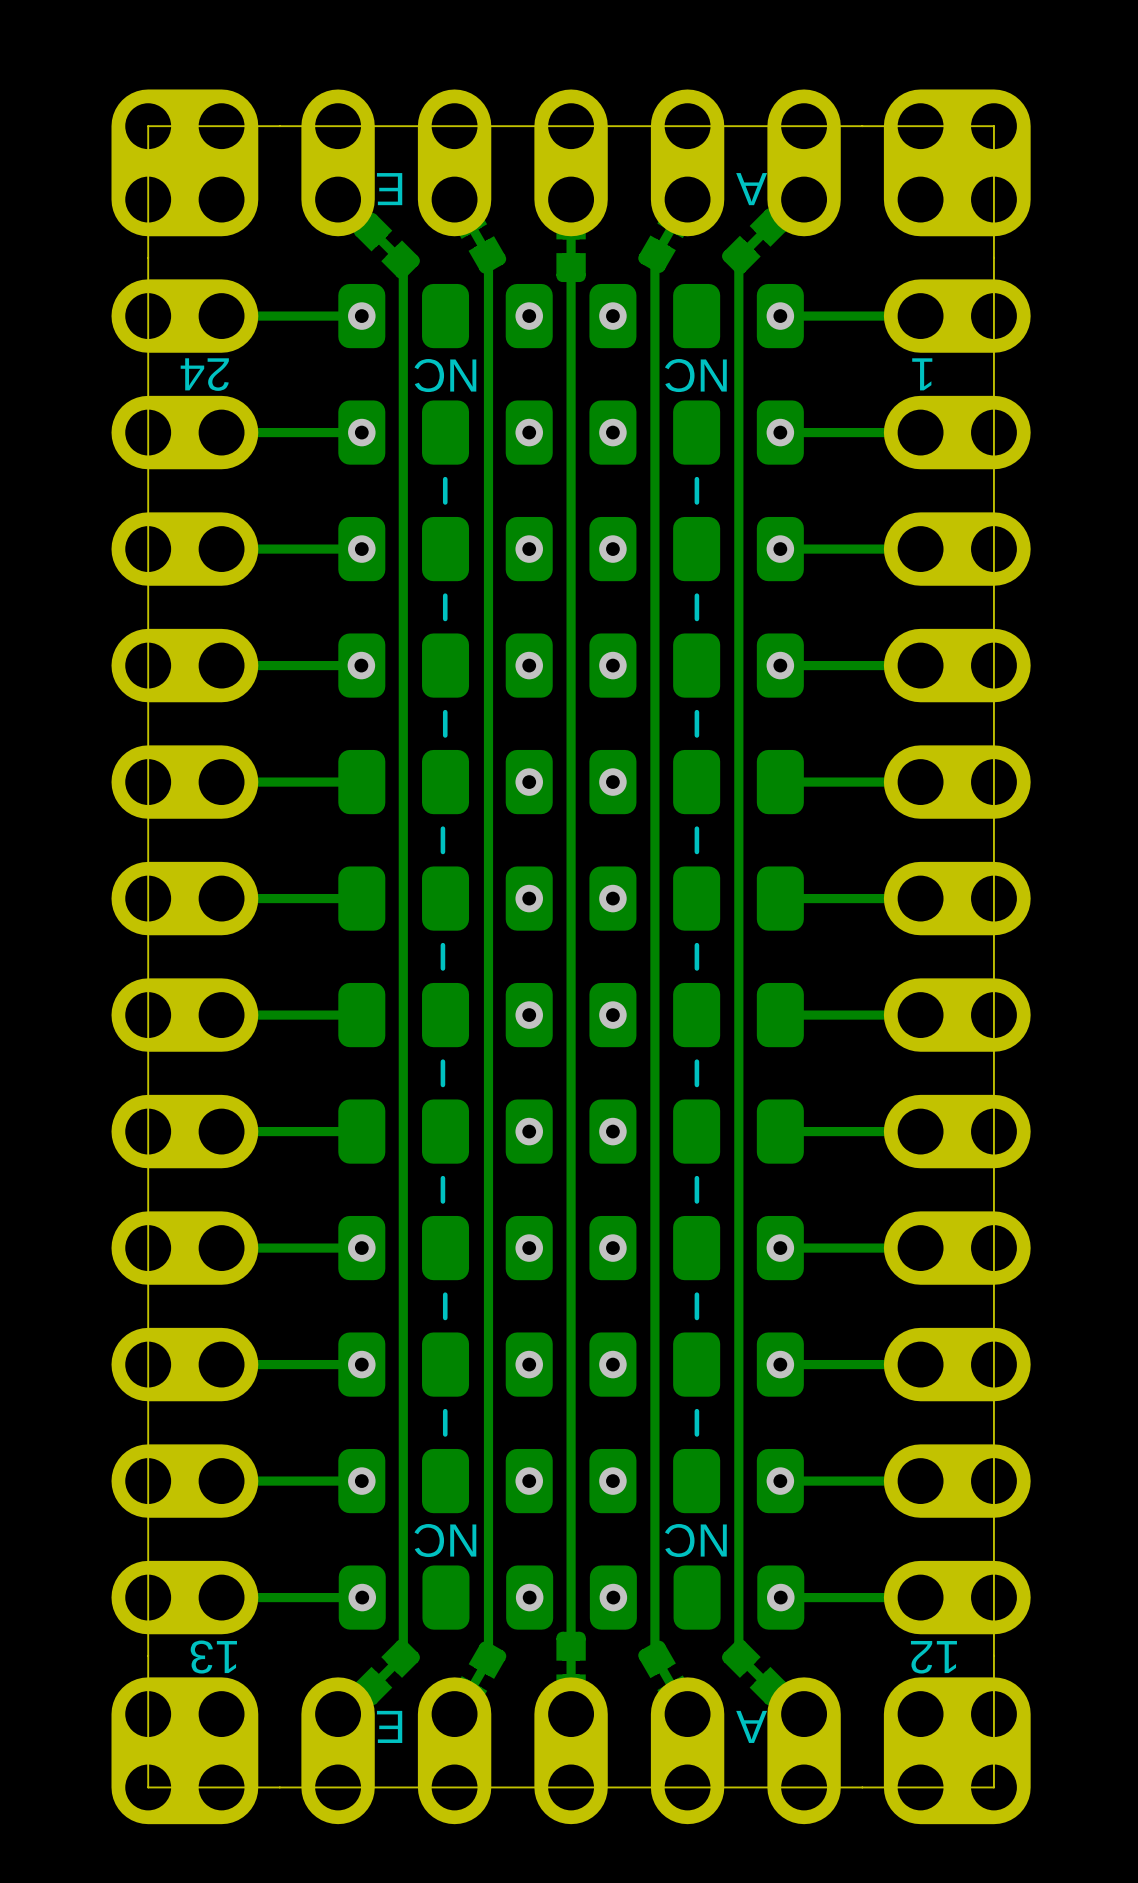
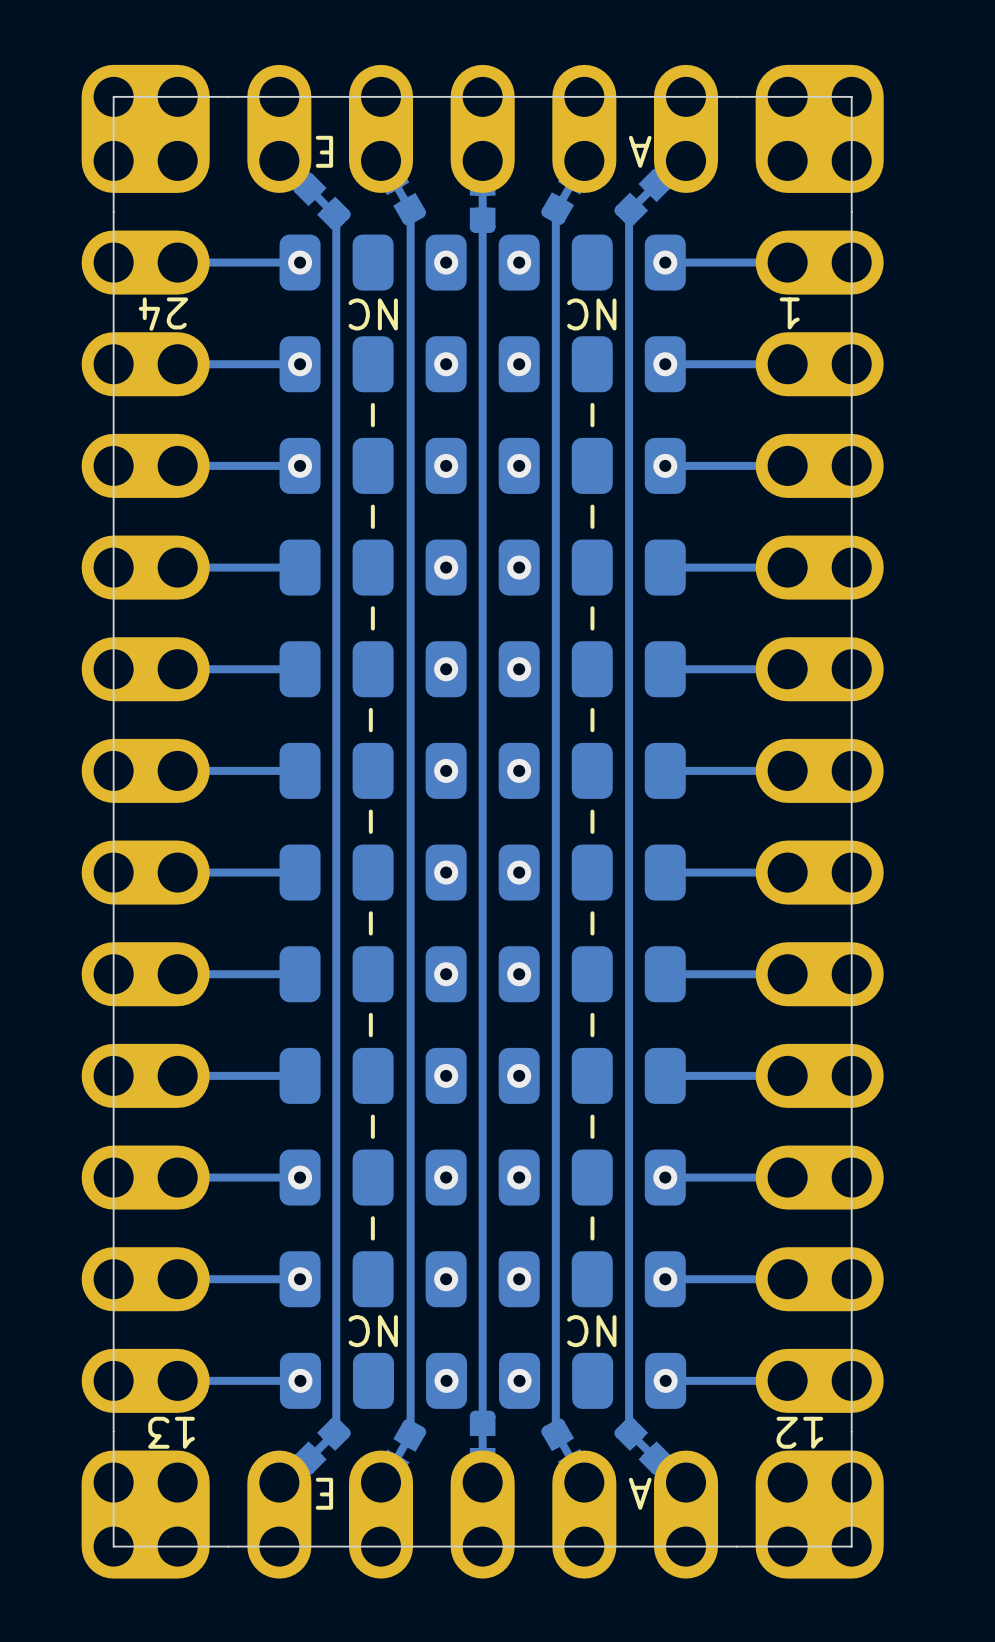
via: (361, 665) -> none
via: (780, 665) -> none
via: (361, 1248) -> none
via: (780, 1248) -> none

